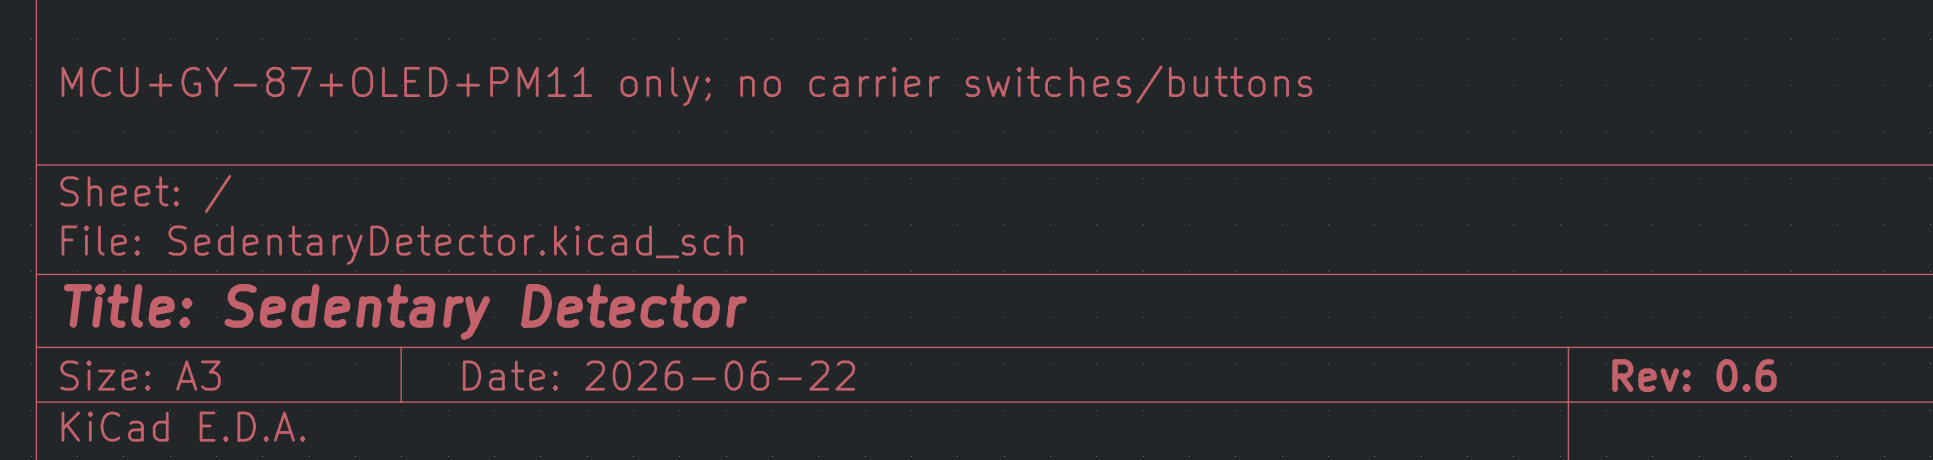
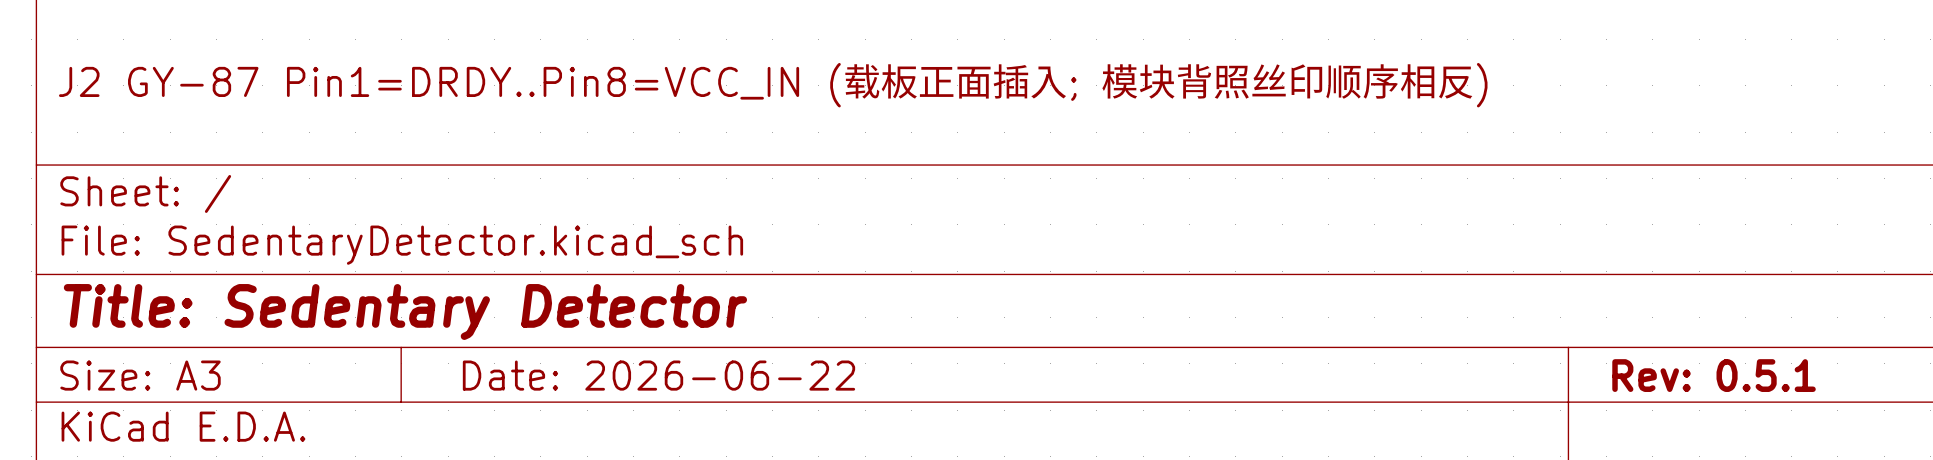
title block: MCU+GY-87+OLED+PM11 only; no carrier switches/buttons (686, 85) -> J2 GY-87 Pin1=DRDY..Pin8=VCC_IN (载板正面插入; 模块背照丝印顺序相反) (773, 85)
title block: Rev: 0.6 (1694, 375) -> Rev: 0.5.1 (1714, 375)

